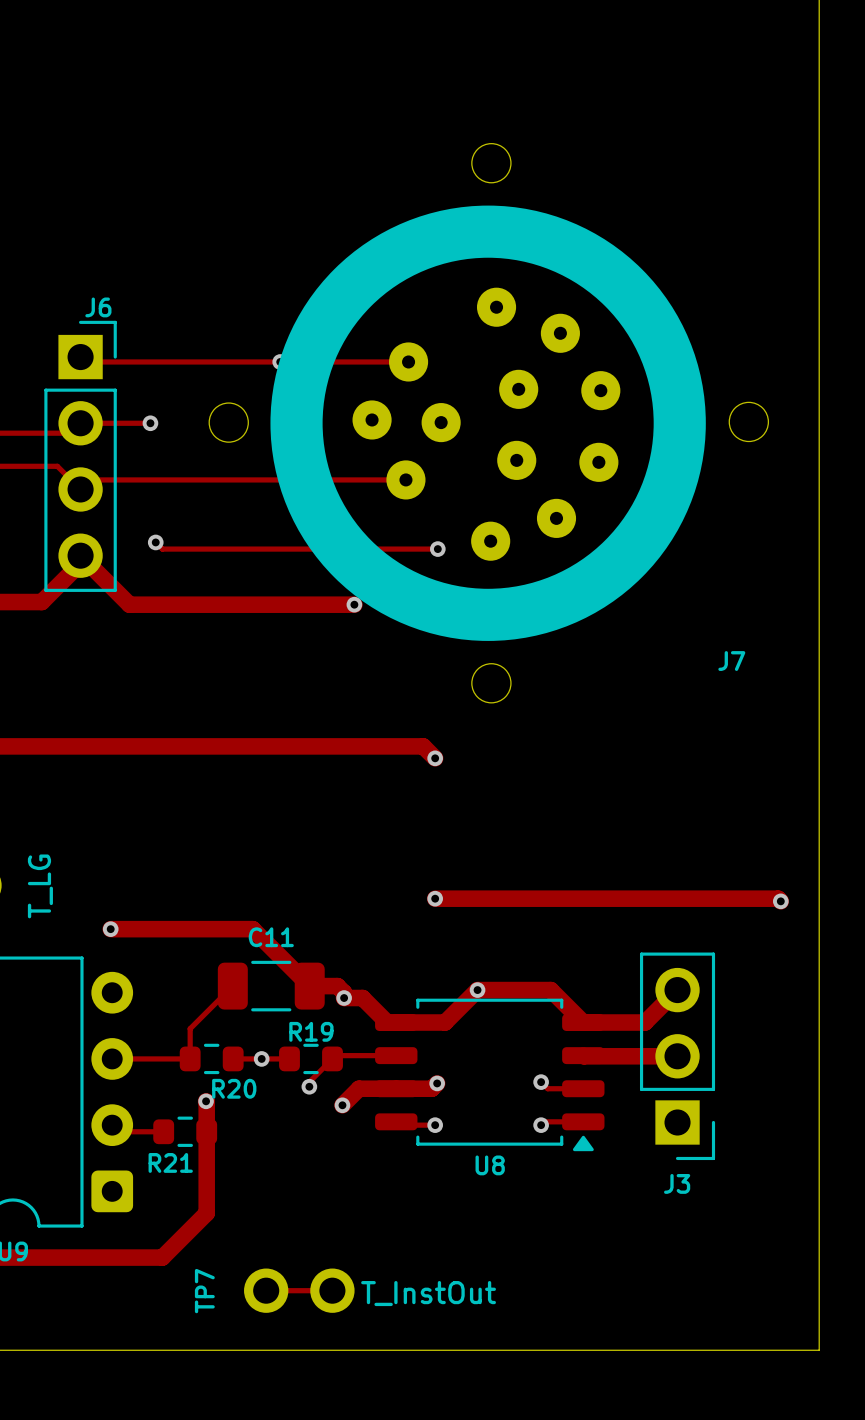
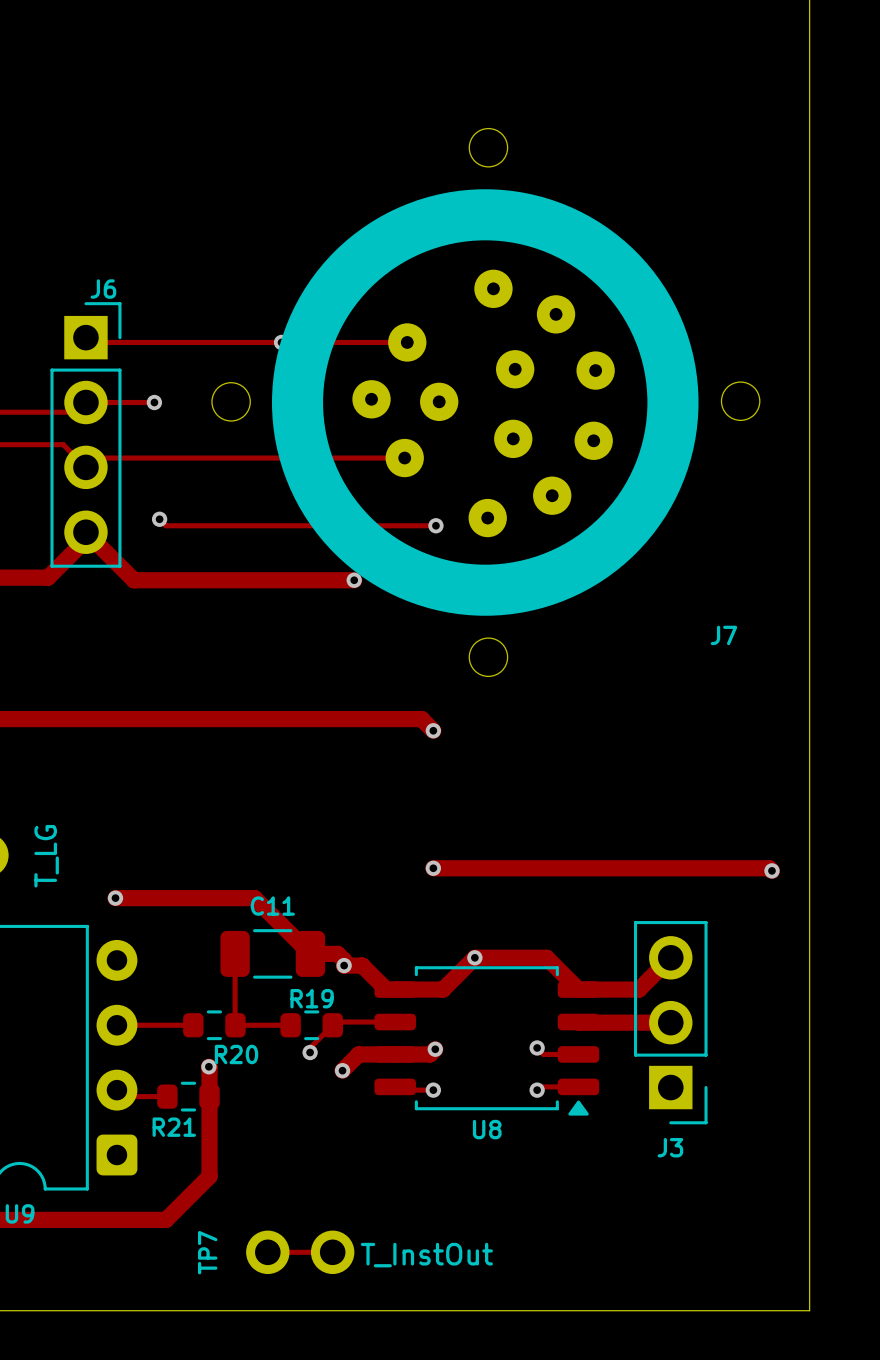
track: (232, 986) (190, 1028) (190, 1058) -> (235, 953) (235, 1024)
via: (261, 1058) -> none

